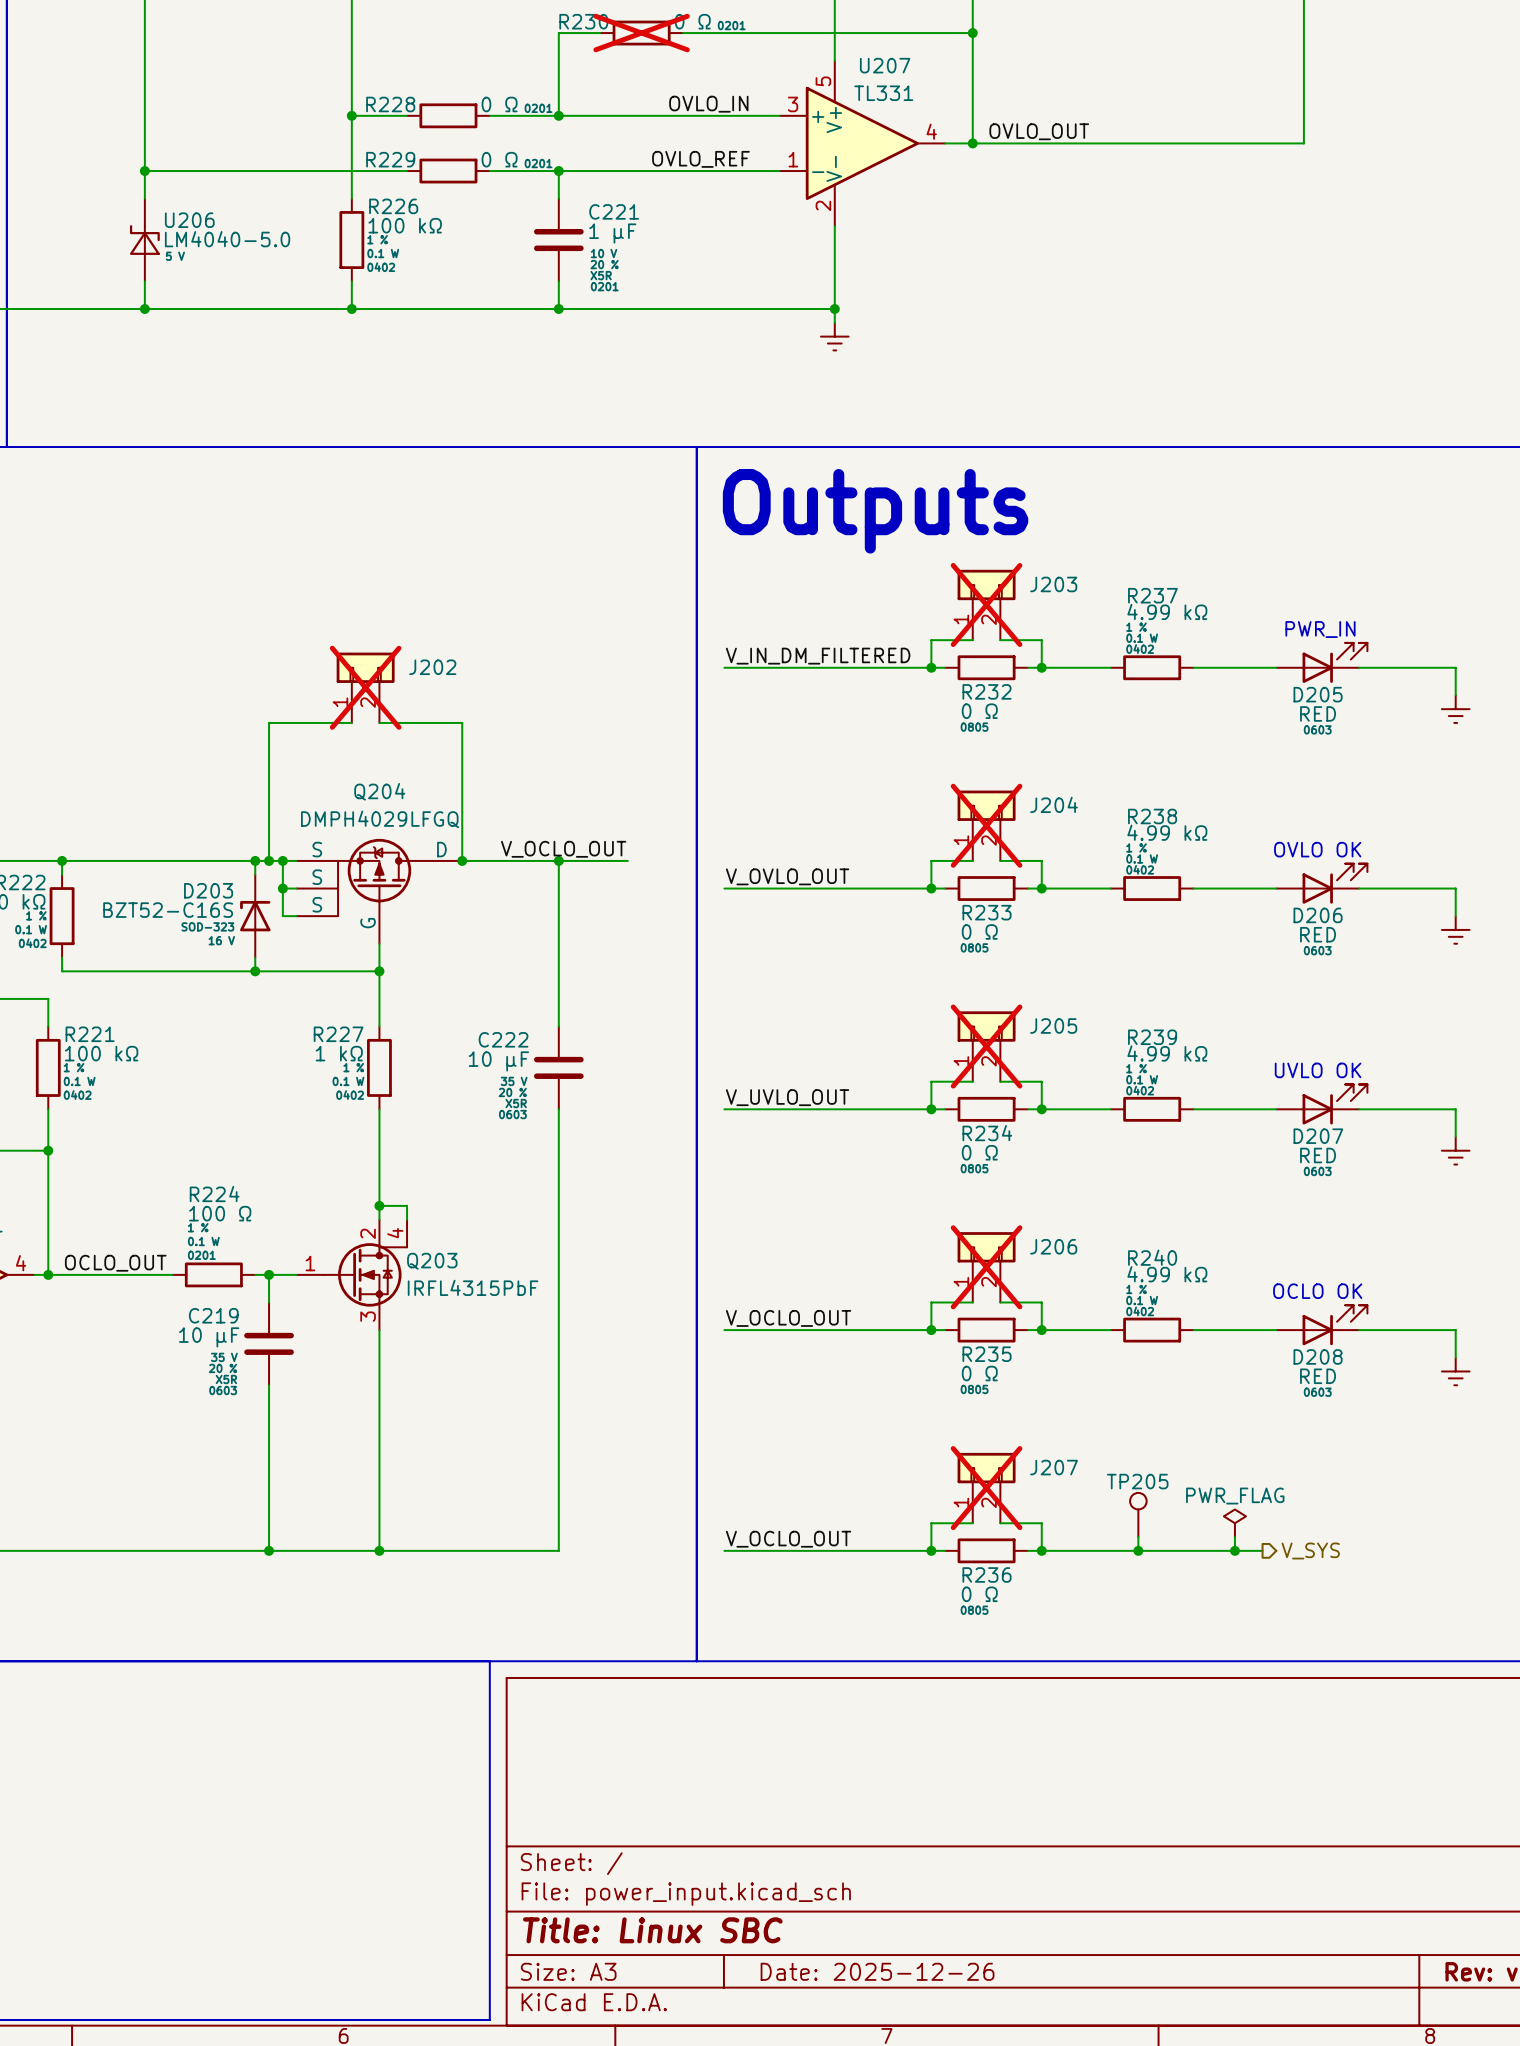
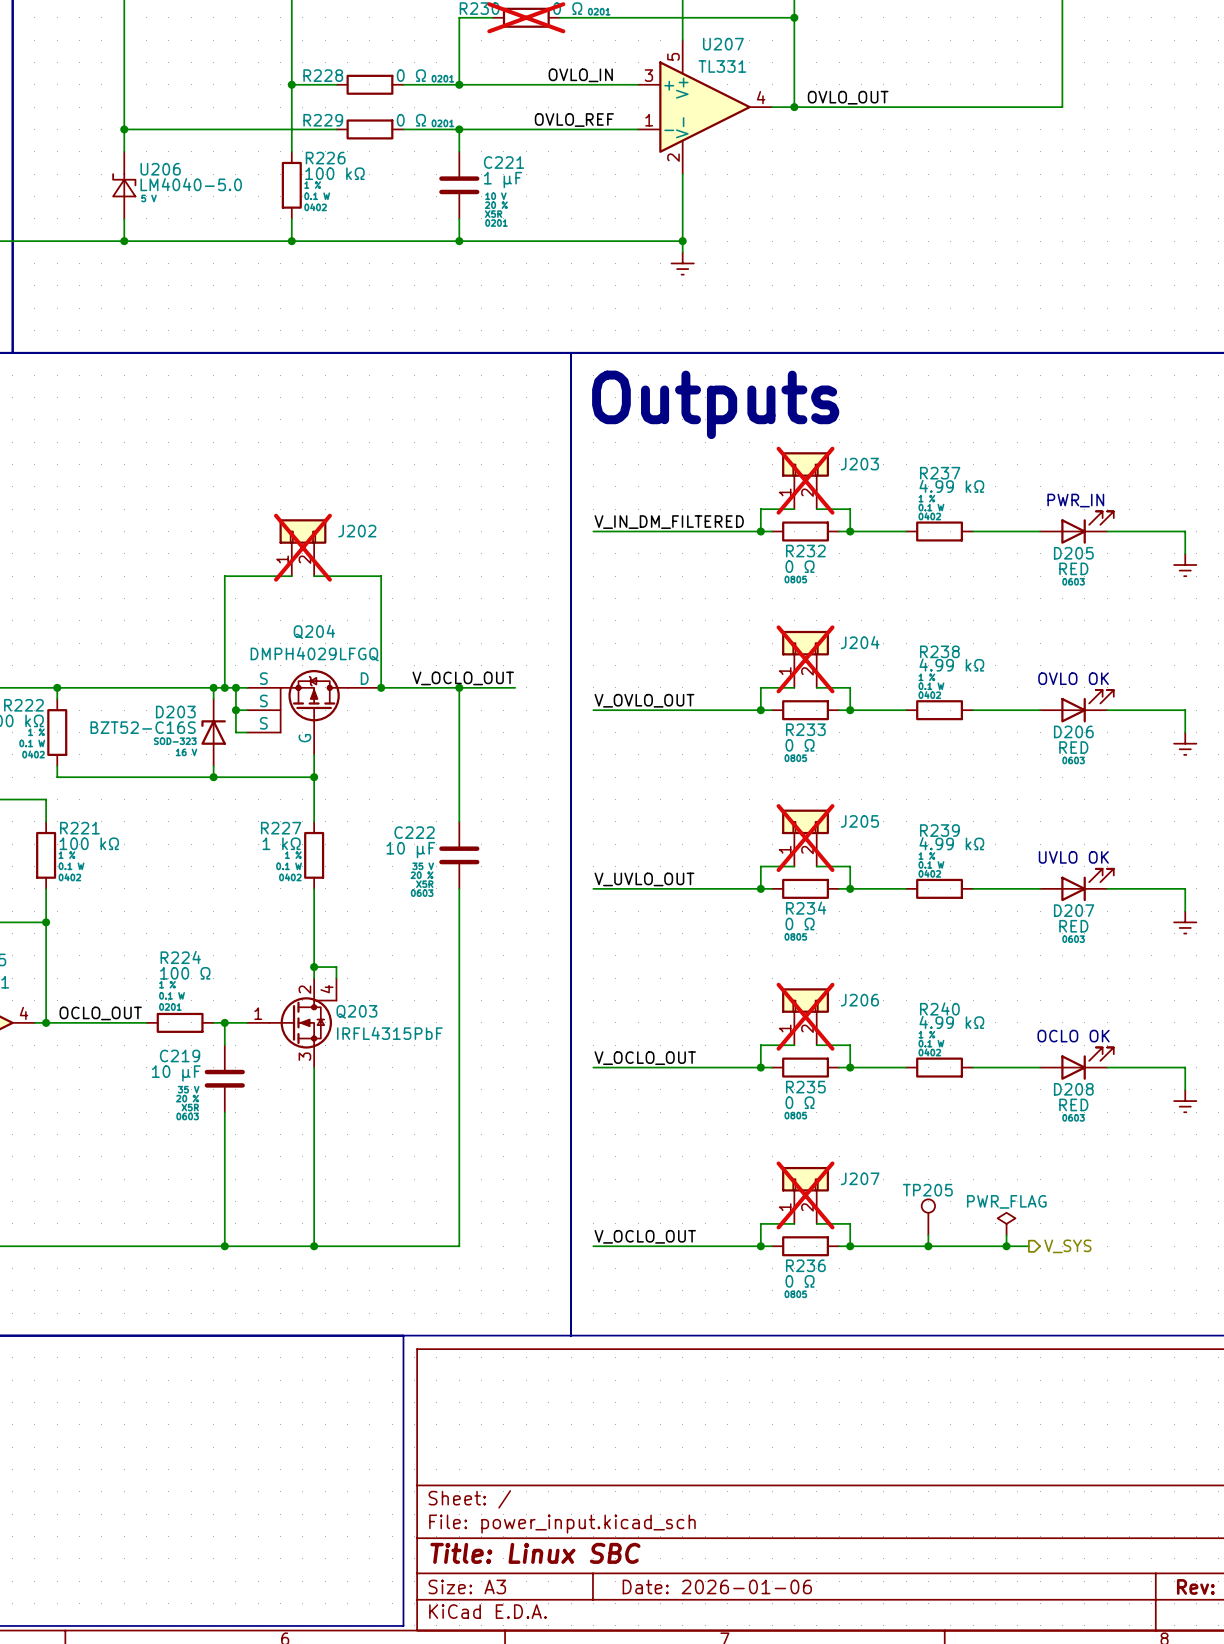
title block: Date: 2025-12-26 (877, 1971) -> Date: 2026-01-06 (717, 1586)

